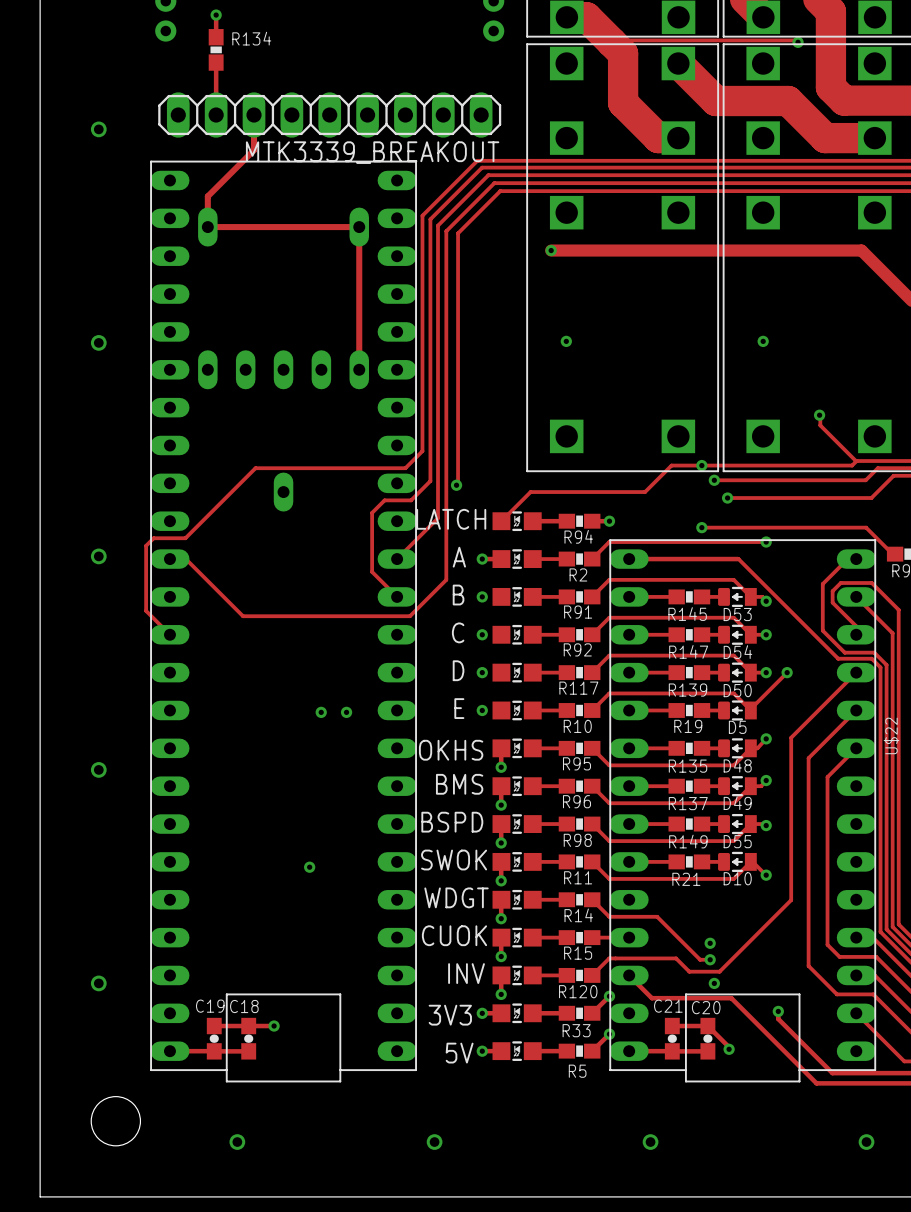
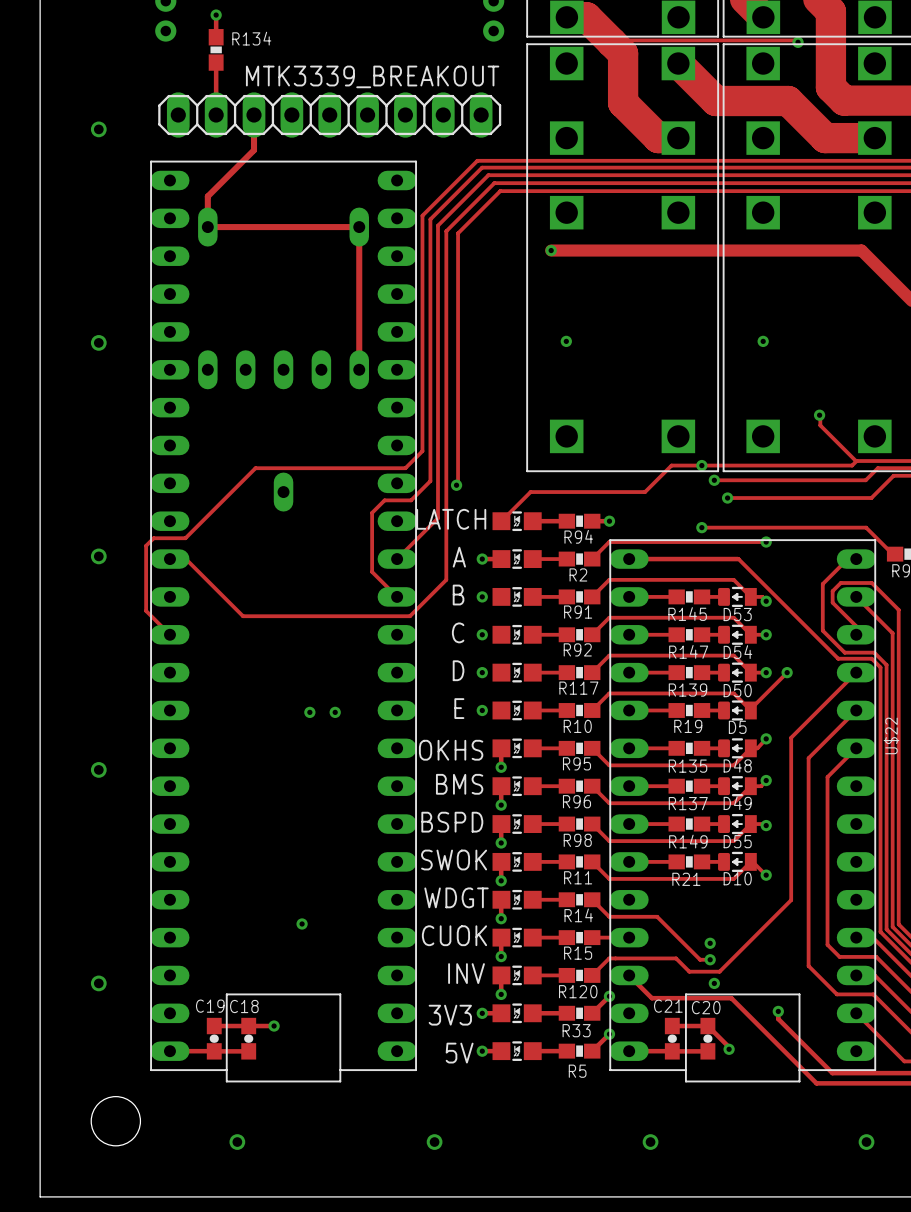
MTK3339_BREAKOUT name position: MTK3339_BREAKOUT (372, 152) -> MTK3339_BREAKOUT (372, 76)
via: none -> (309, 712)
via: (321, 712) -> none
via: none -> (335, 712)
via: (346, 712) -> none
via position: (309, 867) -> (302, 923)

